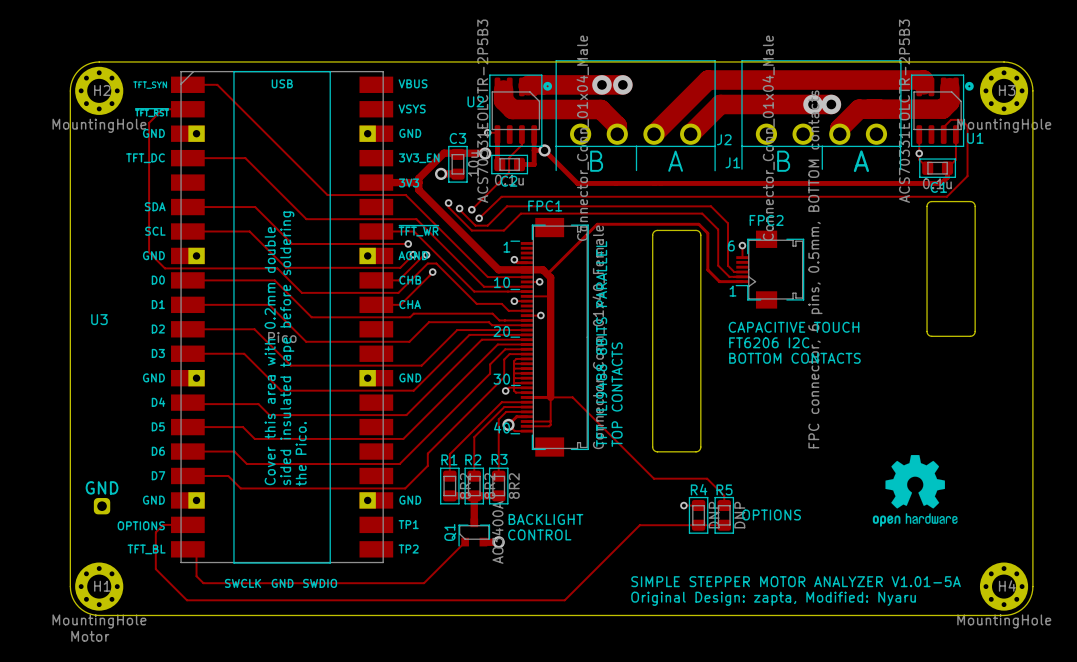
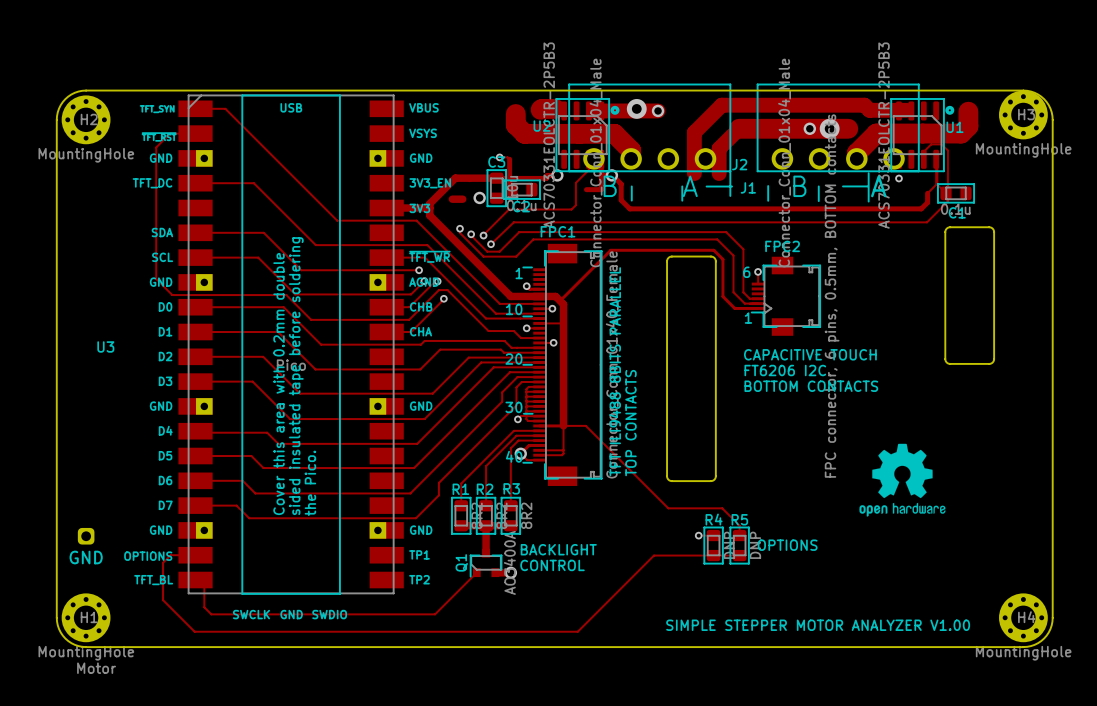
track: (544, 84) (622, 84) -> none
via: (601, 84) -> none
track: (923, 84) (923, 80) (708, 80) (653, 134) -> none
track: none -> (593, 110) (658, 110)
via: none -> (658, 110)
track: none -> (906, 110) (869, 110) (864, 105) (721, 105) (694, 132) (694, 173)
H2 position: (99, 90) -> (86, 119)
board edge: (1032, 95) (1031, 83) (1026, 73) (1018, 65) (1004, 61) (99, 61) (83, 66) (73, 78) (70, 91) (70, 586) (72, 597) (78, 607) (88, 613) (99, 615) -> (1052, 119) (1050, 108) (1044, 99) (1034, 92) (1023, 90) (86, 90) (71, 94) (60, 105) (56, 119) (56, 617) (60, 632) (71, 643) (82, 646) (105, 647)
track: (723, 104) (720, 104) (690, 134) -> (739, 128) (719, 148) (719, 173)
via: none -> (809, 128)
via: (831, 104) -> none
U2 position: (520, 110) -> (587, 135)
U1 position: (942, 110) -> (922, 135)
track: (521, 134) (521, 144) (509, 157) (509, 172) (471, 209) -> none
track: (534, 134) (534, 164) (519, 164) -> (601, 159) (601, 189) (586, 189)
track: none -> (588, 159) (588, 169) (575, 182) (575, 205) (571, 209) (508, 209) (483, 234)
track: (943, 134) (943, 127) (951, 119) (961, 119) (967, 126) (967, 176) (946, 196) (909, 196) -> (923, 159) (923, 151) (931, 144) (941, 144) (947, 150) (947, 201) (927, 222)
track: (955, 134) (955, 159) (947, 168) (947, 177) (941, 183) (903, 183) -> (936, 159) (936, 184) (927, 193) (927, 202) (921, 208)
U1 name position: U1 (975, 138) -> U1 (955, 127)
line: (556, 146) (556, 170) -> none
line: (636, 146) (636, 170) -> none
line: (741, 146) (741, 169) -> none
line: (822, 146) (822, 169) -> none
line: (900, 146) (900, 169) -> none
line: none -> (868, 173) (868, 201)
track: none -> (549, 175) (546, 178) (496, 178)
track: (544, 150) (577, 183) (660, 183) -> none
track: none -> (601, 175) (612, 175) (621, 184) (621, 200) (629, 208)
via: none -> (611, 175)
via: (485, 153) -> none
via position: (919, 153) -> (898, 178)
line: none -> (768, 186) (768, 200)
line: none -> (631, 186) (631, 200)
line: none -> (682, 186) (682, 200)
line: none -> (706, 186) (732, 186)
line: none -> (818, 186) (818, 201)
line: none -> (842, 186) (867, 186)
C3 position: (457, 164) -> (496, 188)
via: none -> (479, 197)
via: (441, 173) -> none
text position: GND (102, 487) -> GND (86, 557)
drawing position: (915, 490) -> (902, 480)
part position: (102, 506) -> (86, 536)
text: SIMPLE STEPPER MOTOR ANALYZER V1.01-5A (796, 581) -> SIMPLE STEPPER MOTOR ANALYZER V1.00 (818, 625)
H1 position: (99, 586) -> (86, 617)
text: Original Design: zapta, Modified: Nyaru (773, 598) -> none

